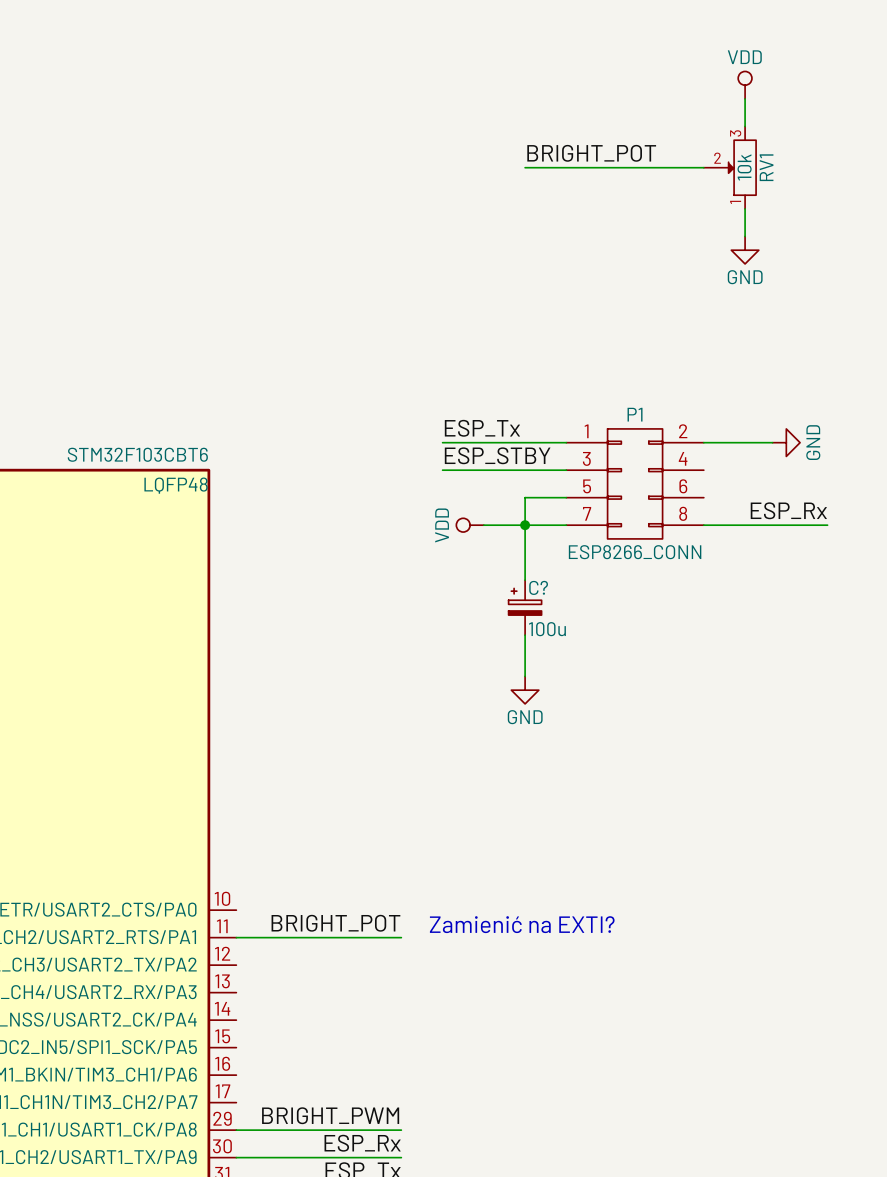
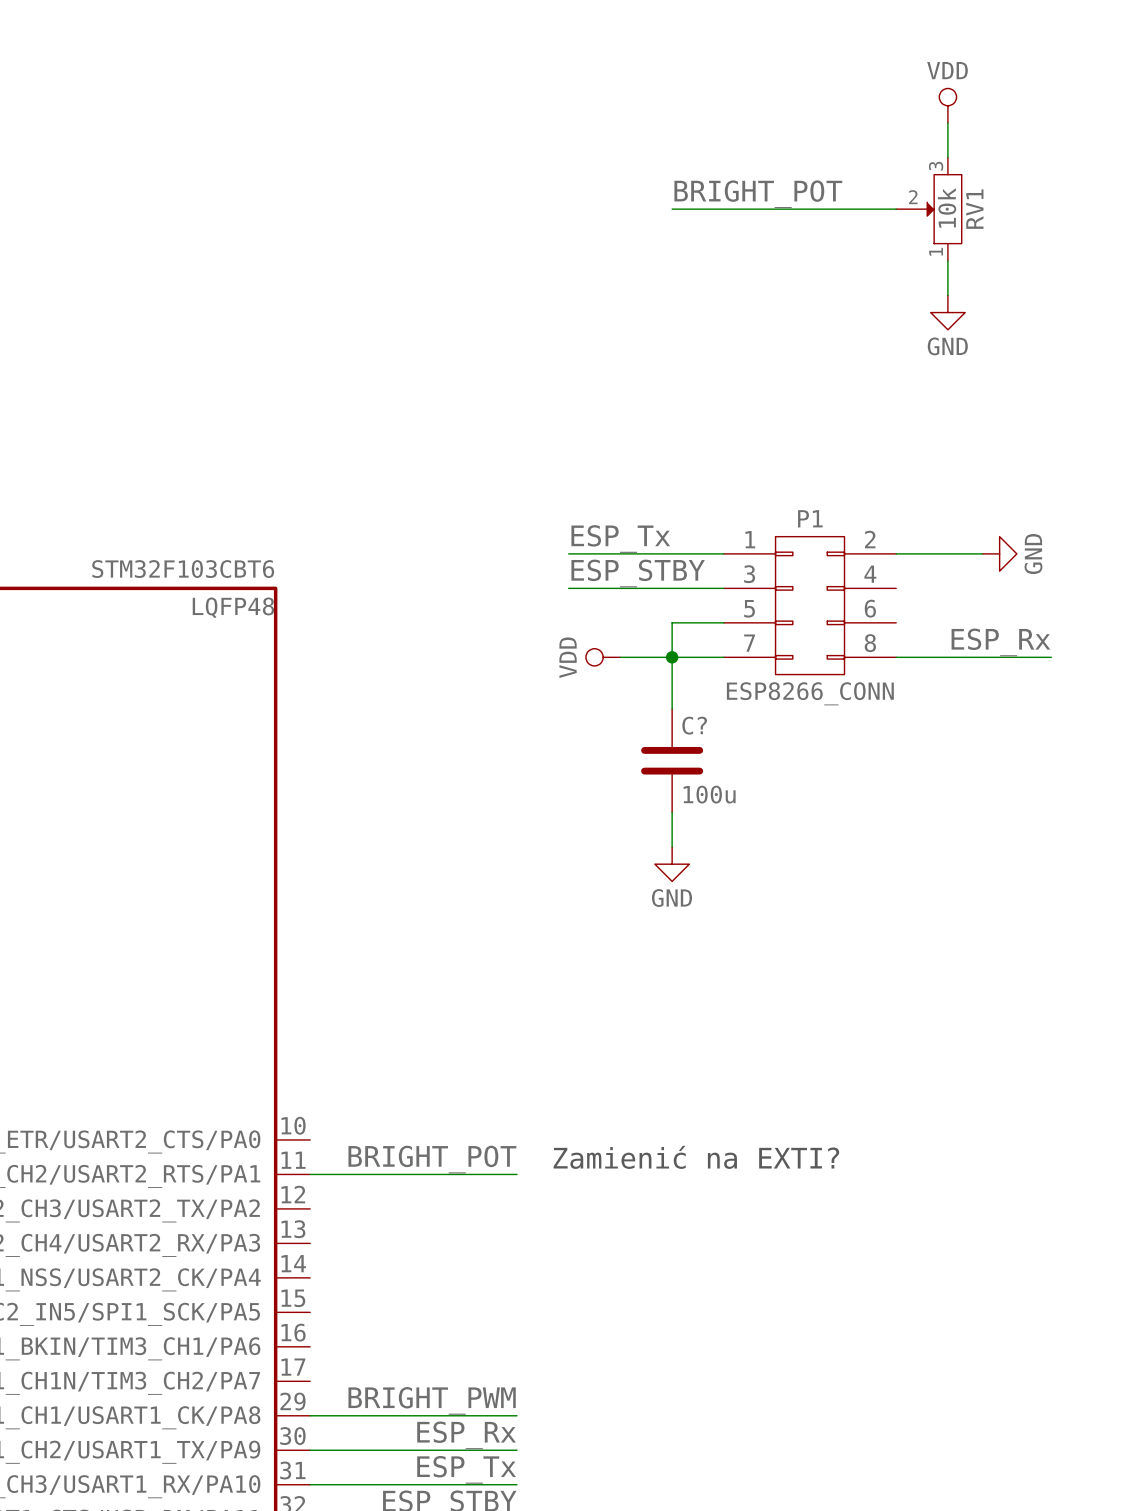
C? symbol: [508, 580, 542, 636] -> [641, 709, 704, 813]

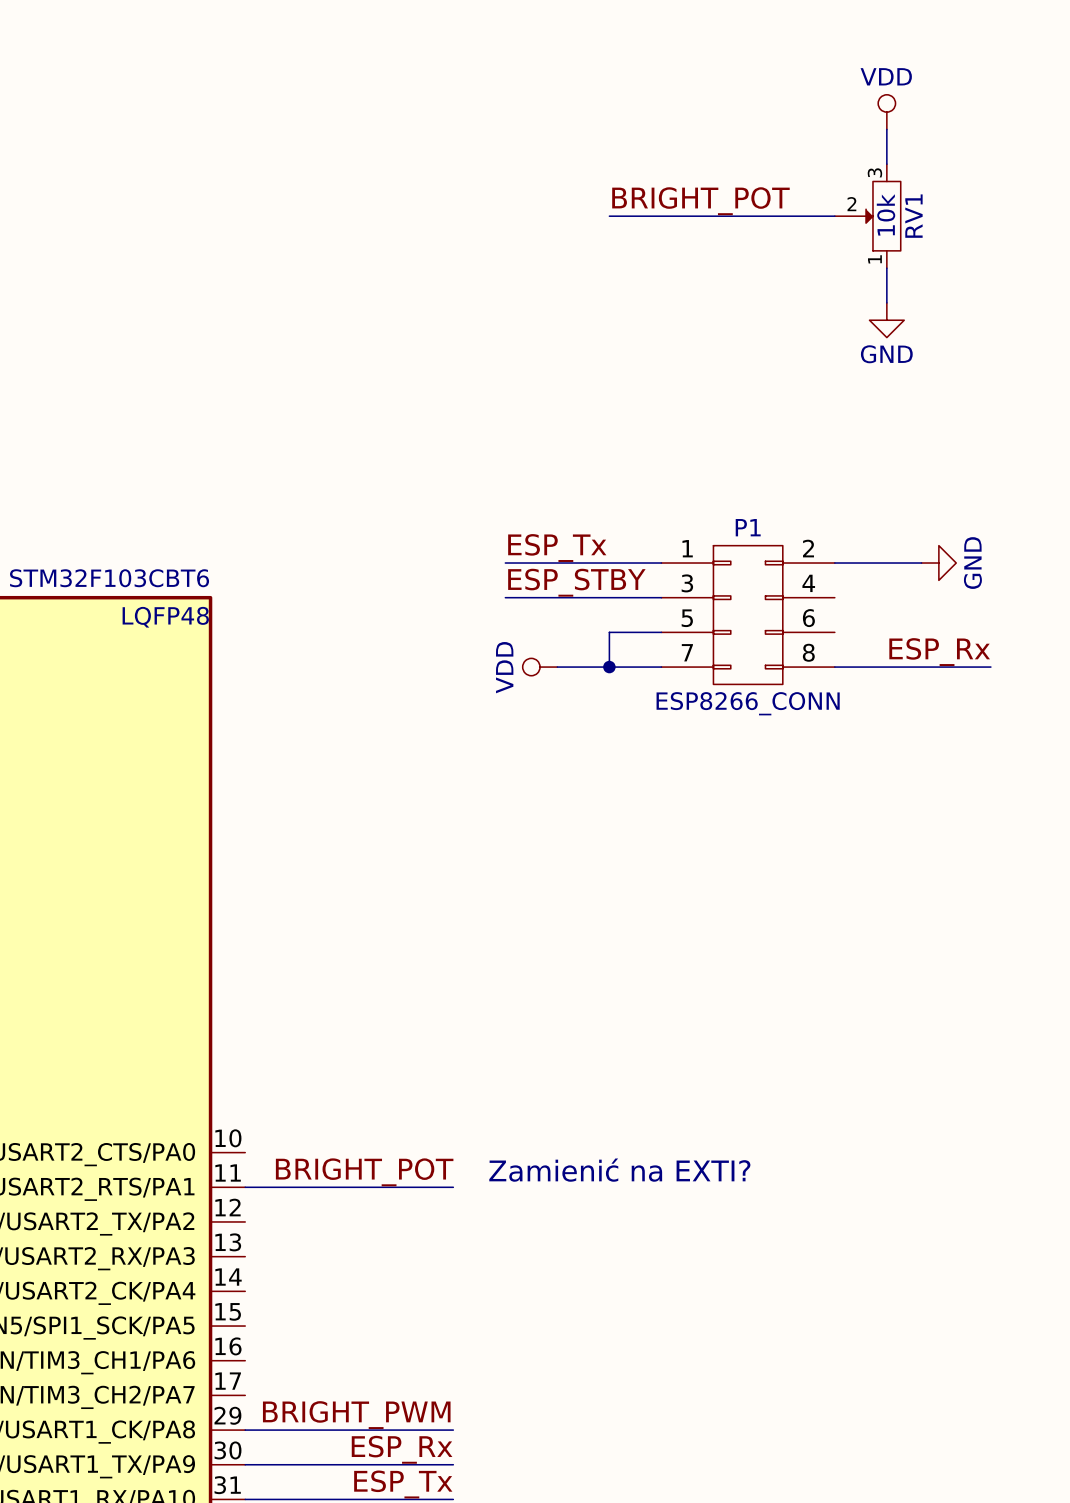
wire: (672, 657) (672, 709) -> none
C?: 100u (672, 760) -> none
wire: (672, 812) (672, 846) -> none
power symbol: GND (672, 864) -> none

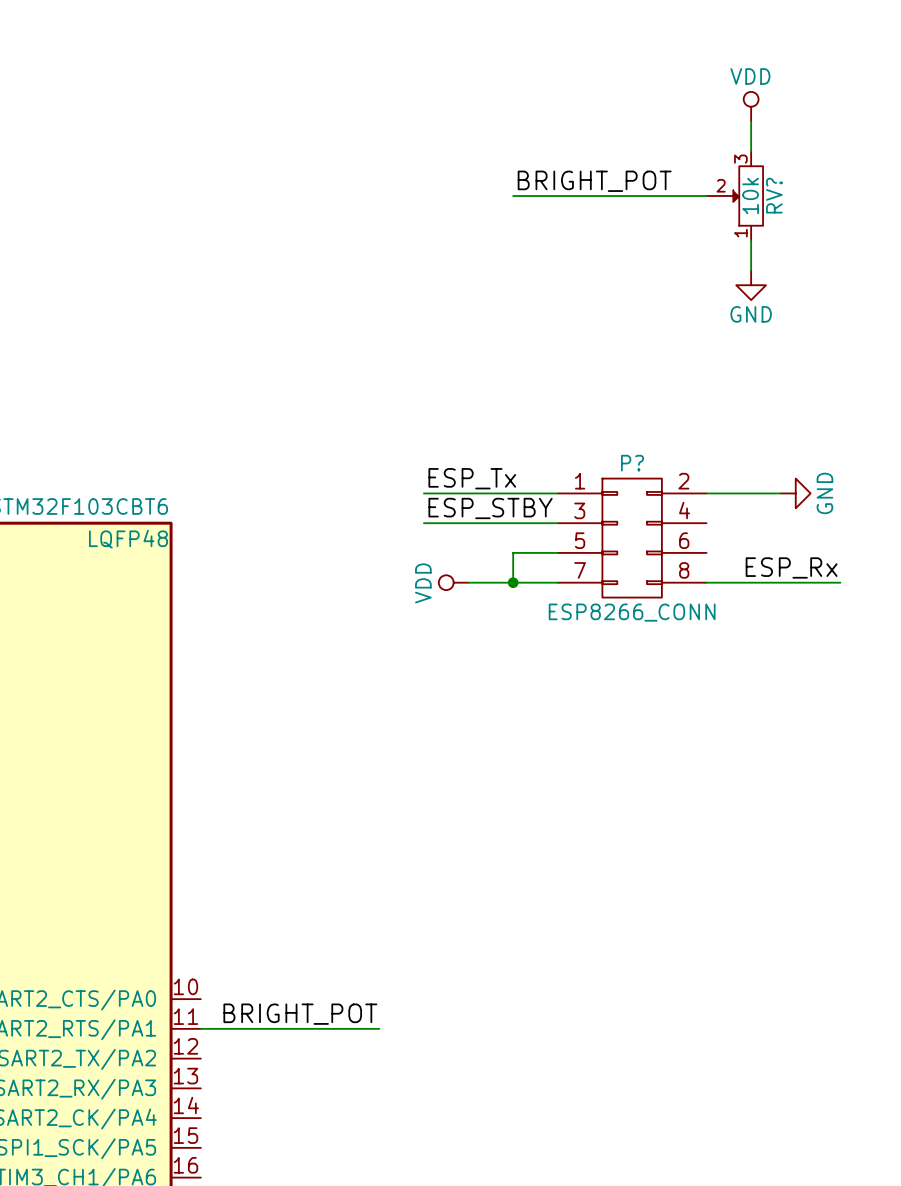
RV1 name: RV1 (913, 216) -> RV? (774, 195)
P1 name: P1 (748, 527) -> P? (632, 463)
text: Zamienić na EXTI? (619, 1170) -> none

